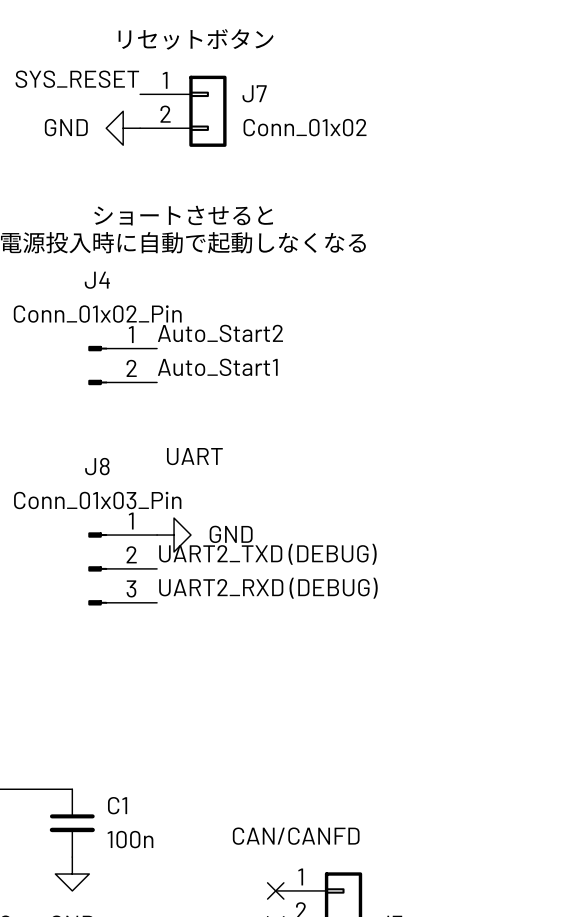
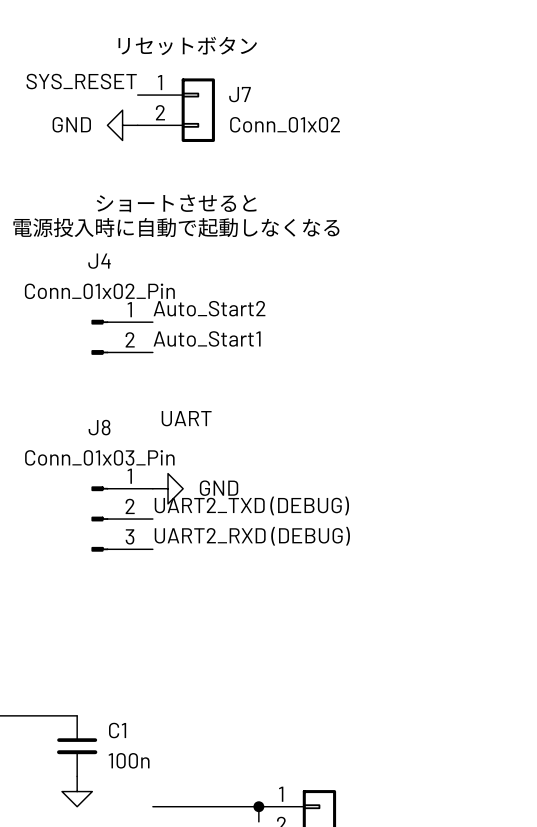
text: CAN/CANFD (296, 836) -> none
wire: none -> (152, 806) (258, 806) (258, 821)
junction: none -> (258, 806)
no-connect mark: (275, 890) -> none

